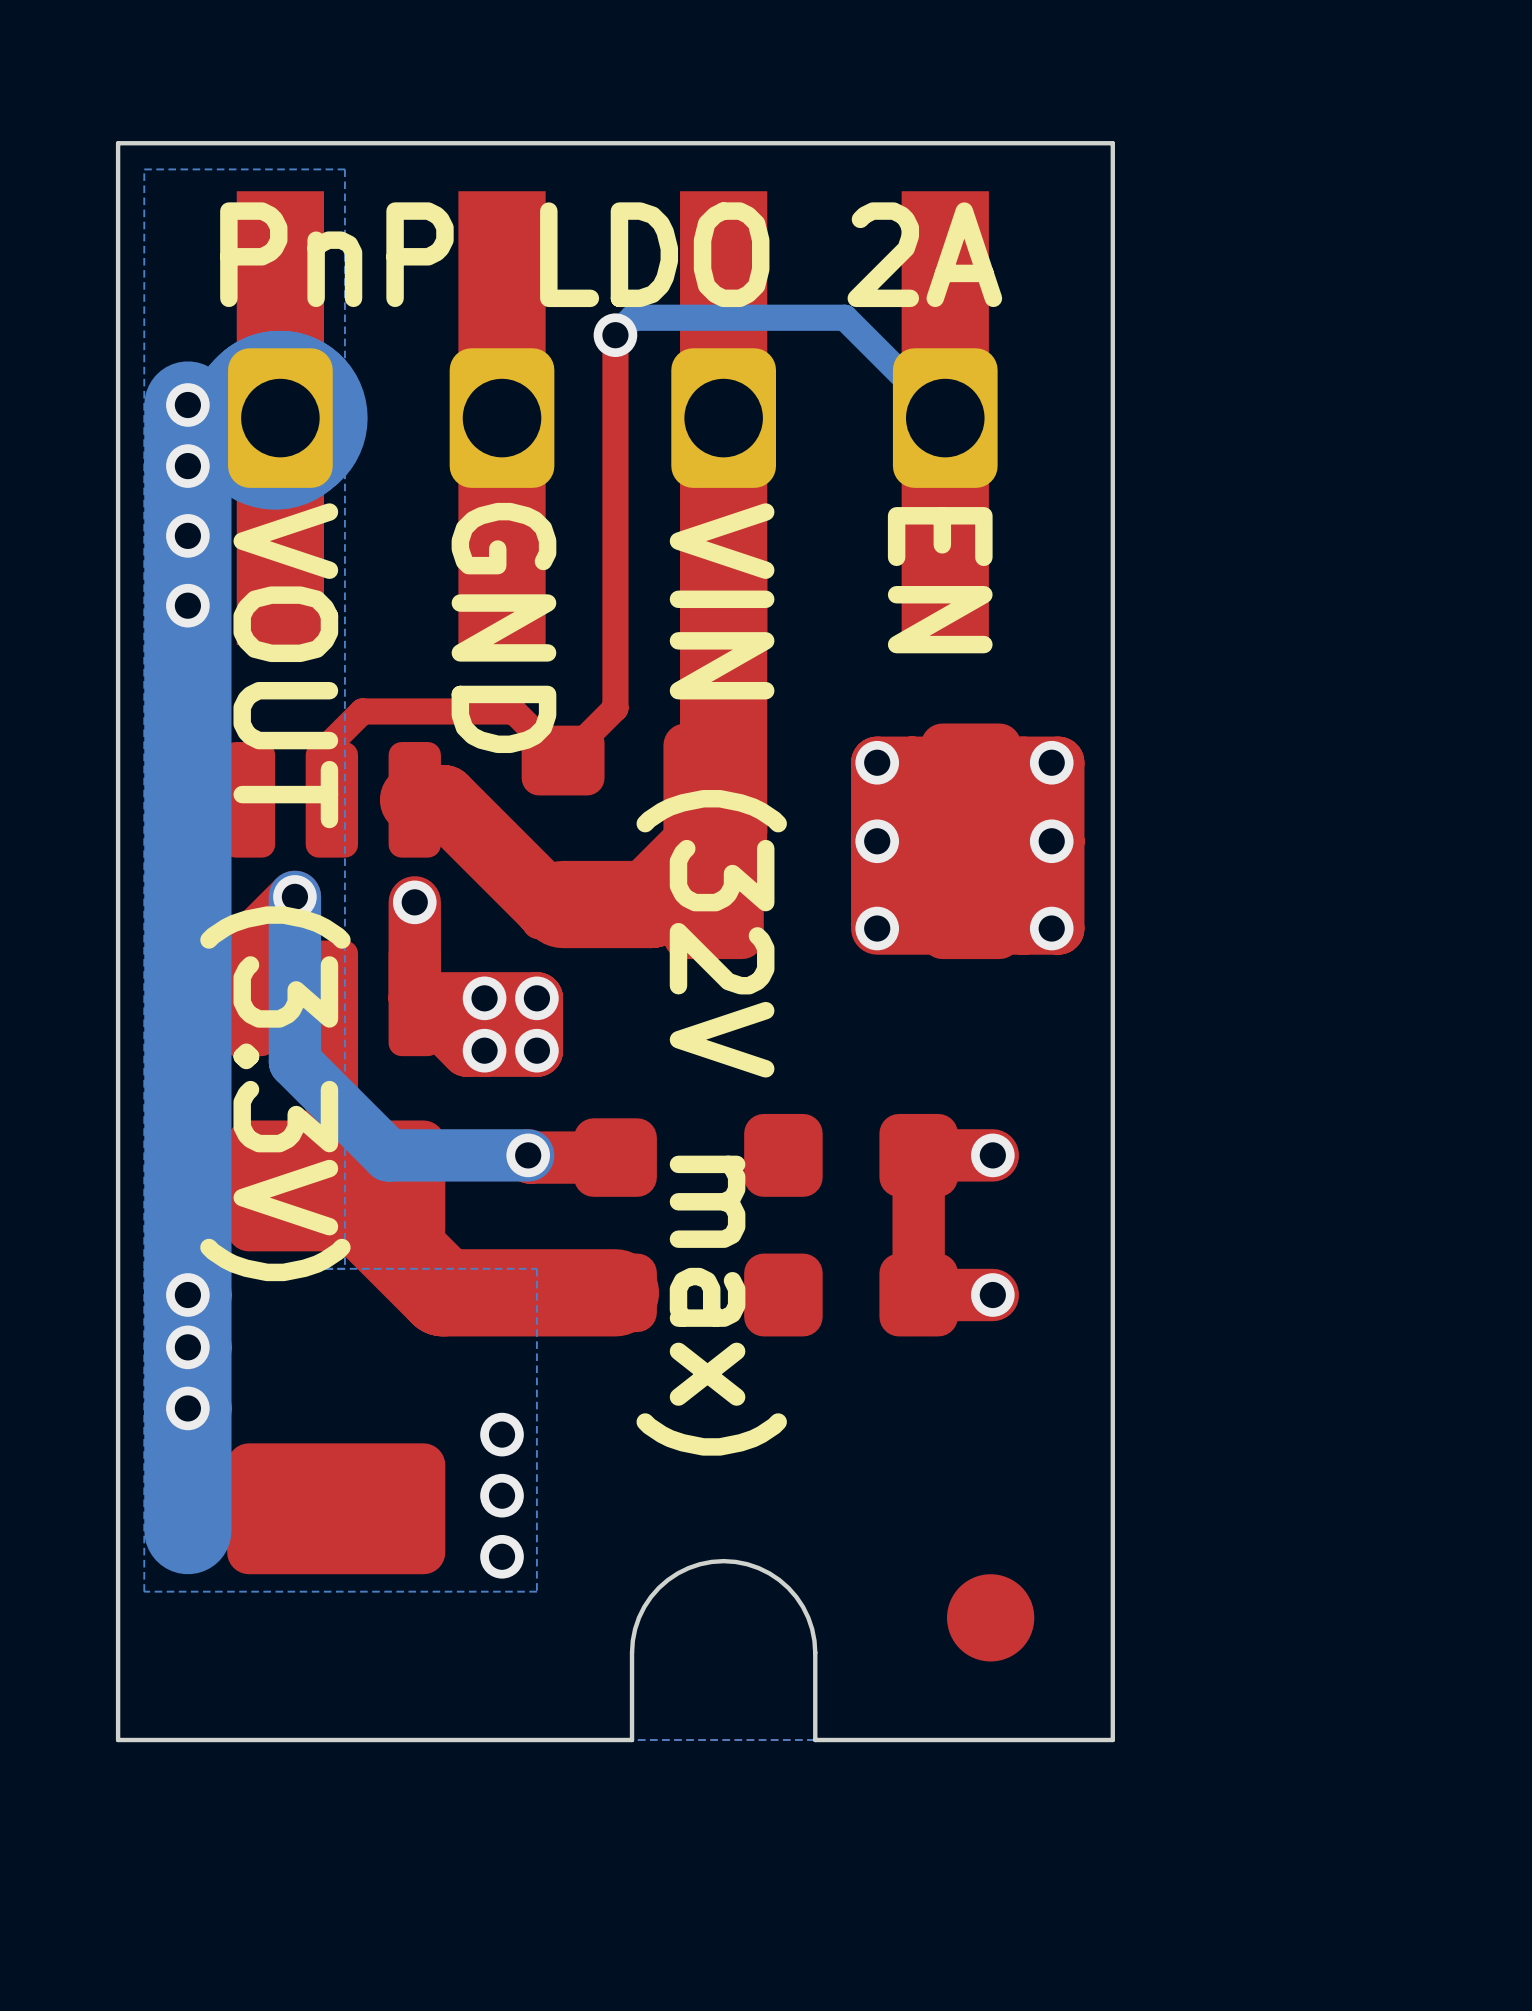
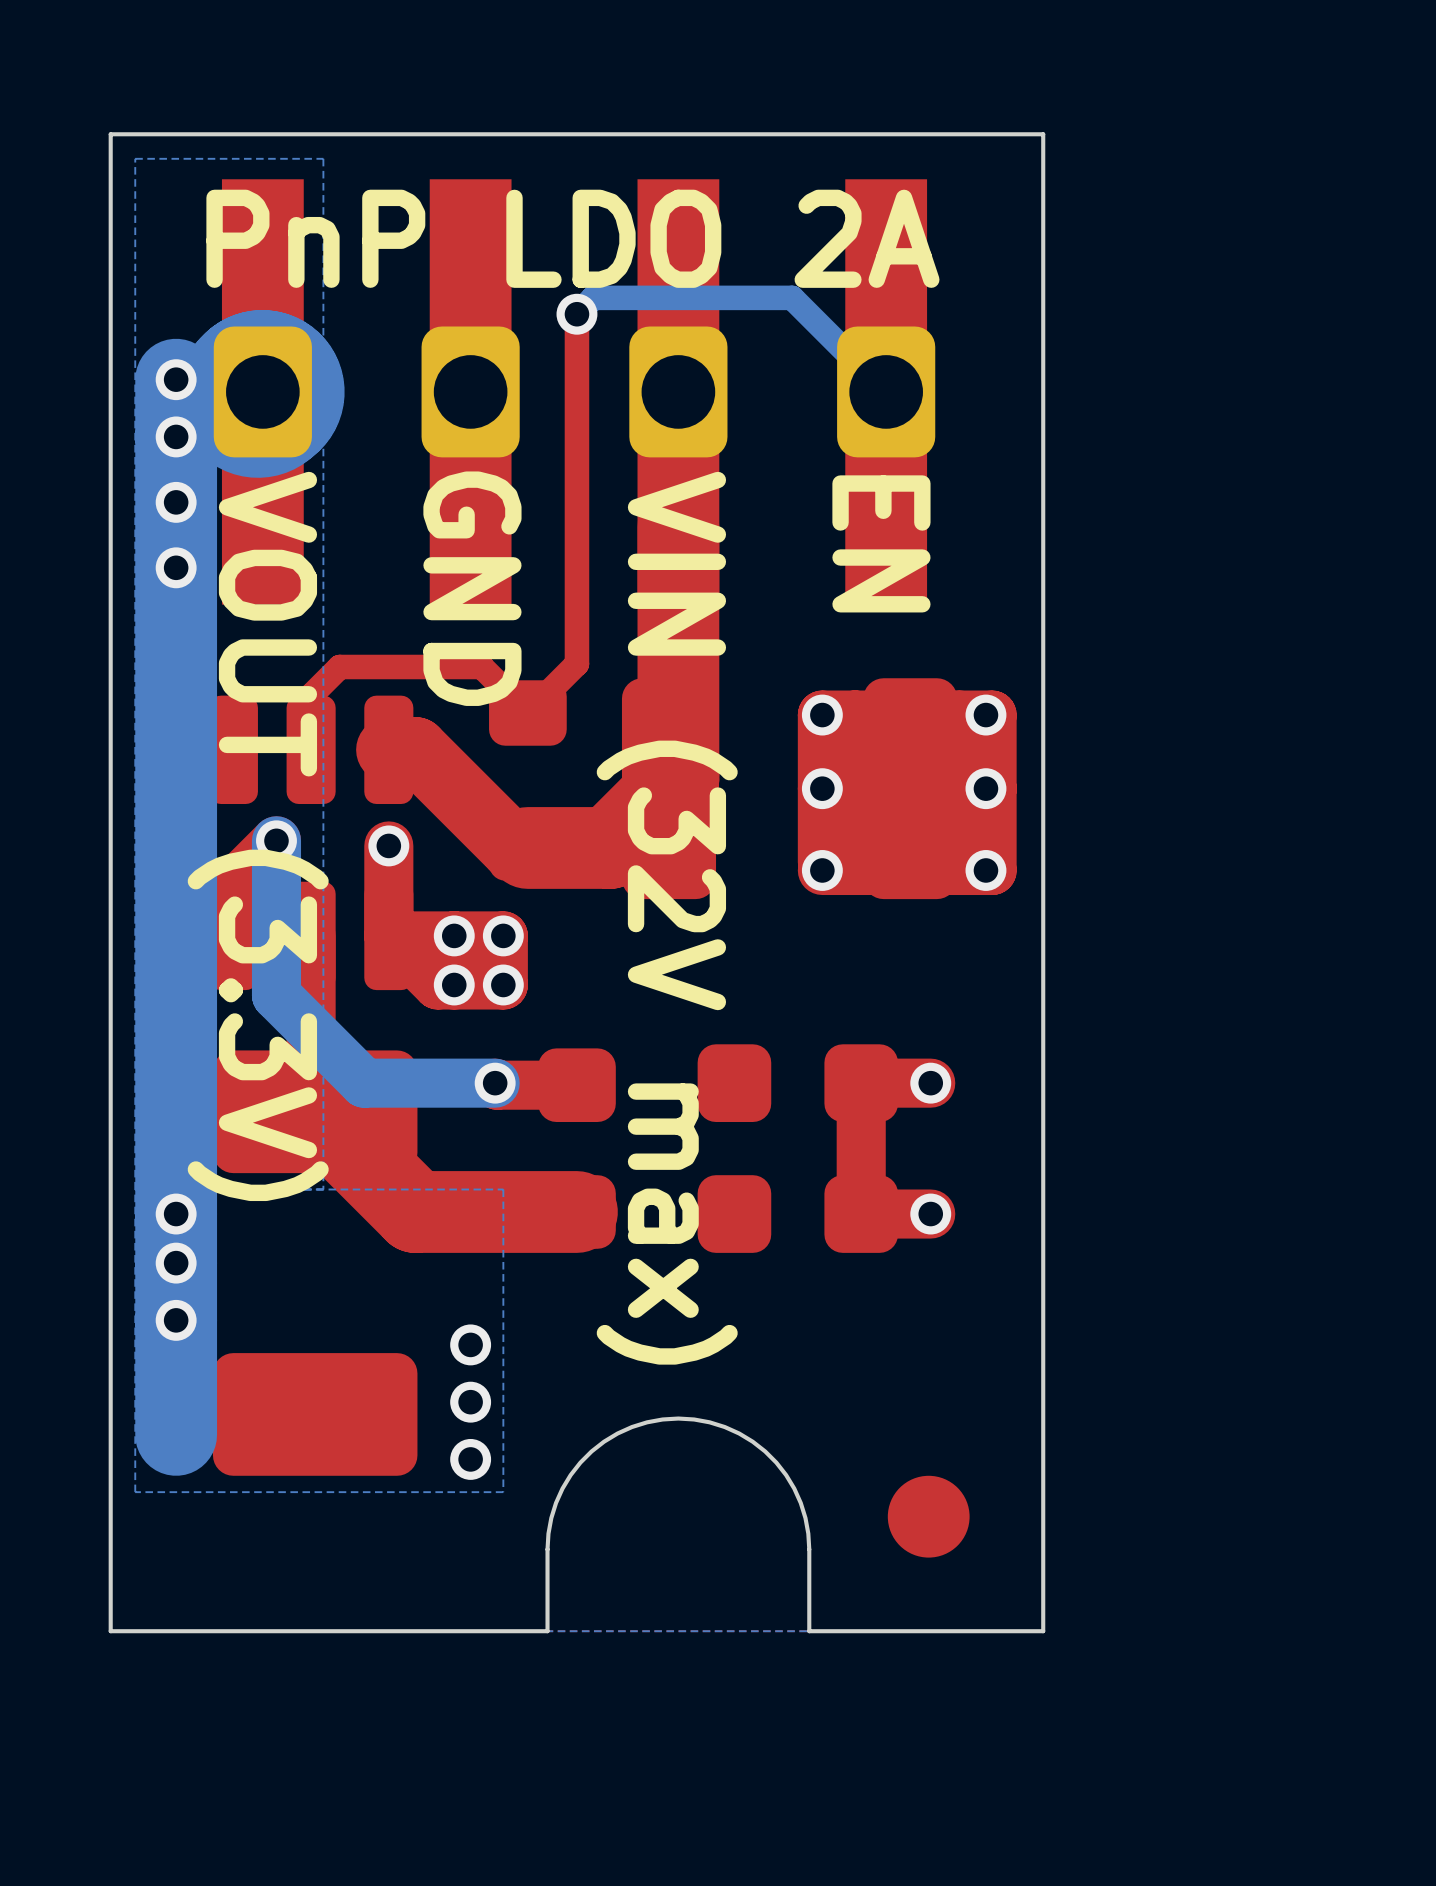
board edge: (863, 1740) (815, 1740) (814, 1640) (812, 1629) (802, 1606) (788, 1587) (769, 1573) (747, 1564) (723, 1561) (699, 1564) (677, 1573) (658, 1587) (644, 1606) (635, 1629) (632, 1640) (632, 1740) (584, 1740) -> (809, 1631) (808, 1533) (800, 1503) (786, 1475) (765, 1451) (739, 1433) (709, 1422) (678, 1418) (647, 1422) (617, 1433) (591, 1451) (570, 1475) (556, 1503) (548, 1533) (547, 1631)

